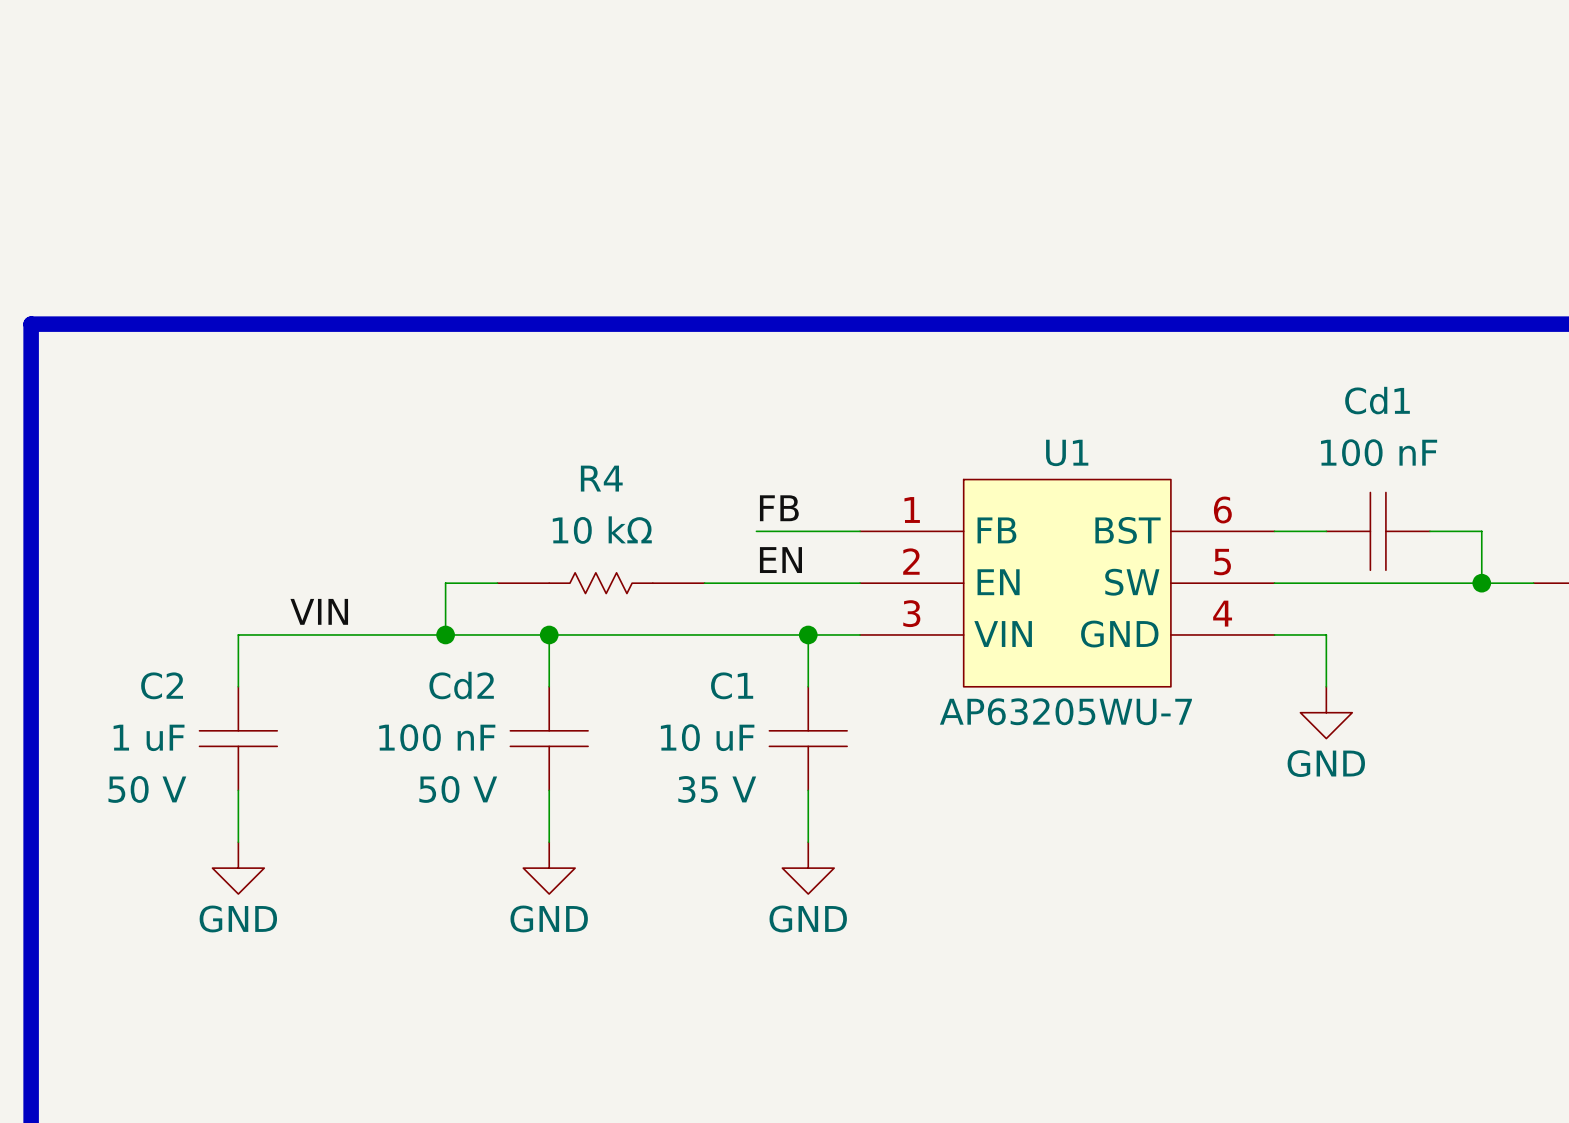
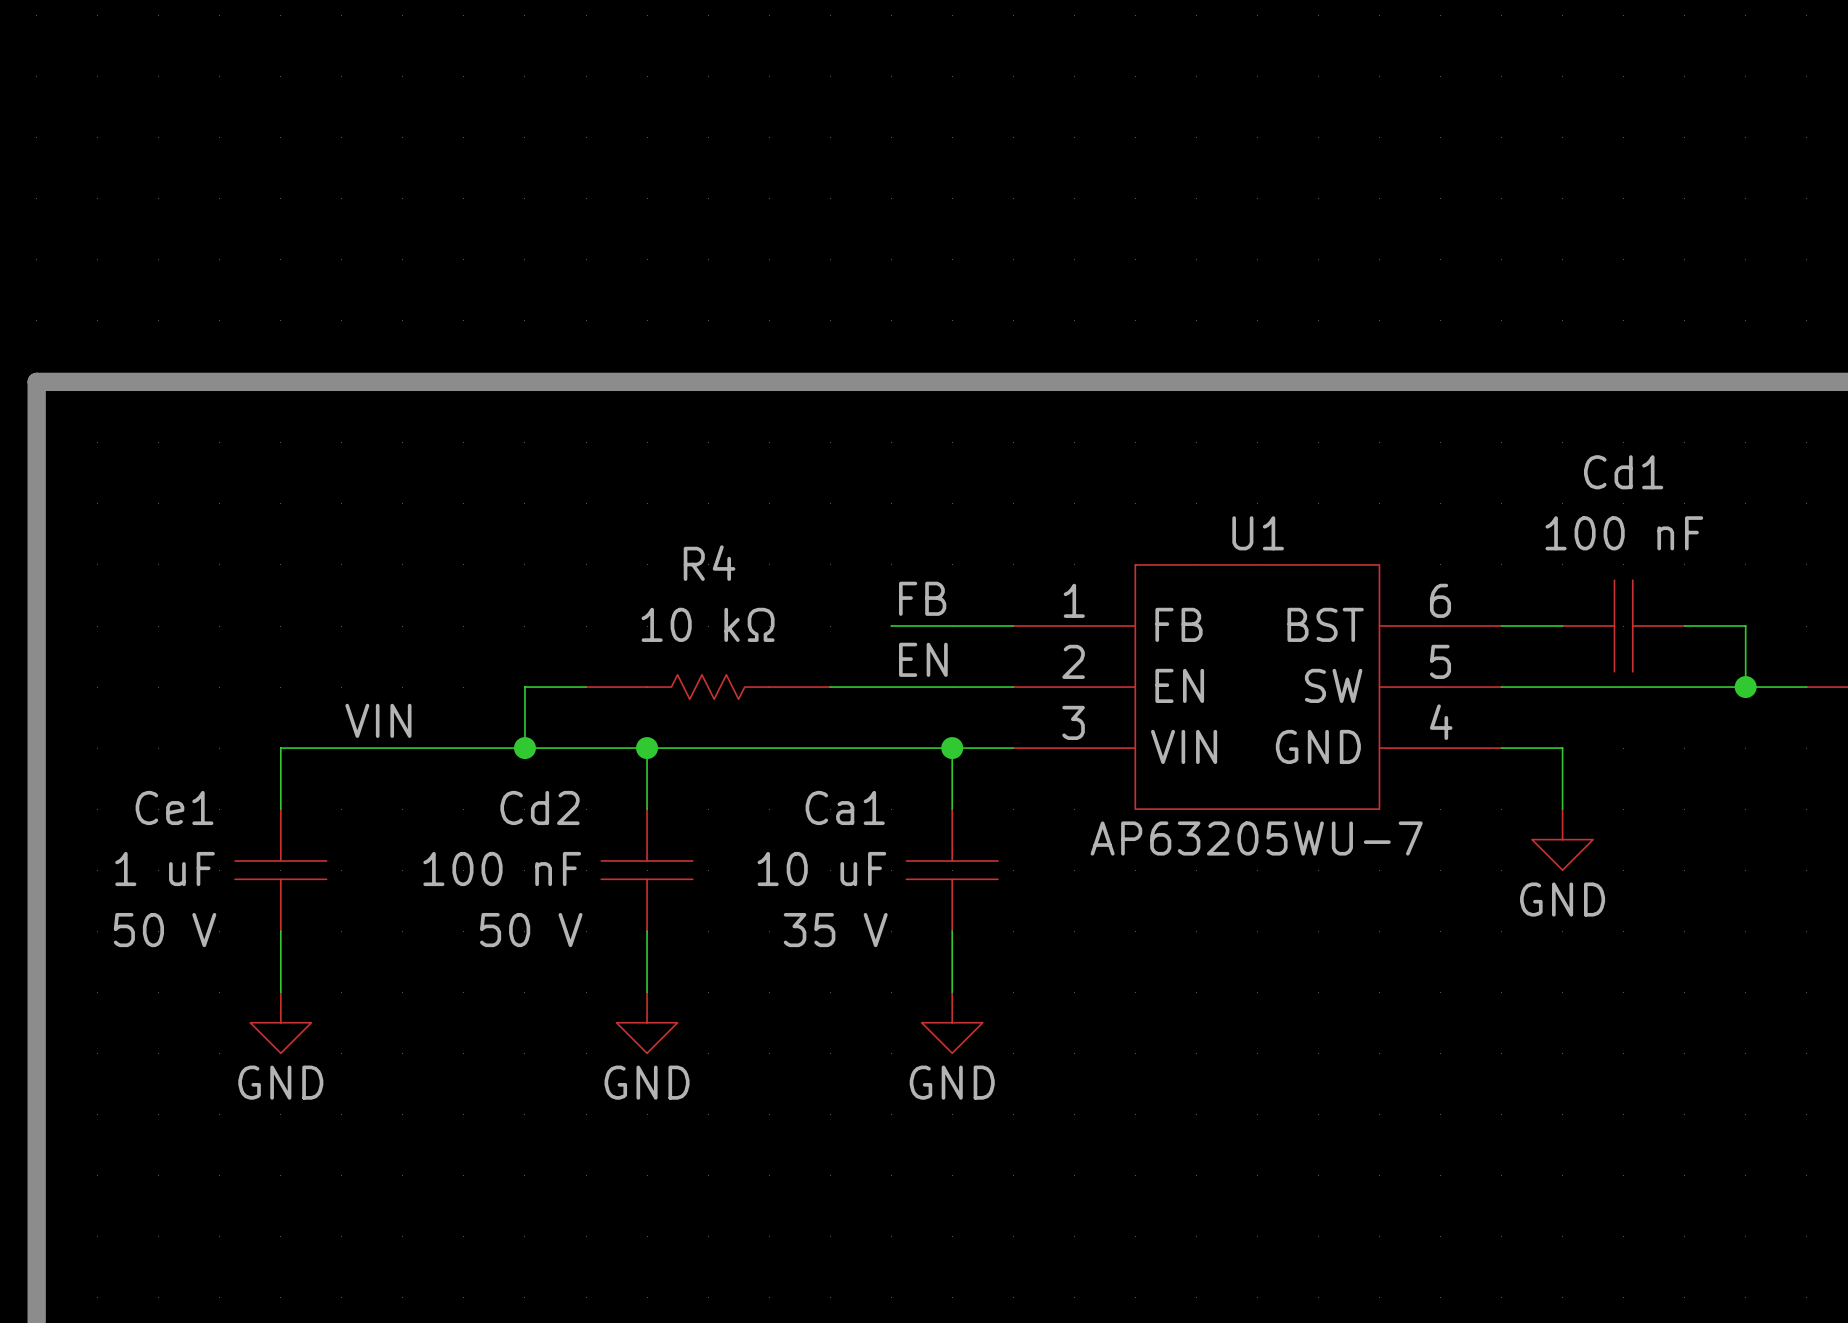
C2 name: C2 (162, 685) -> Ce1 (174, 807)
C1 name: C1 (732, 685) -> Ca1 (845, 807)

